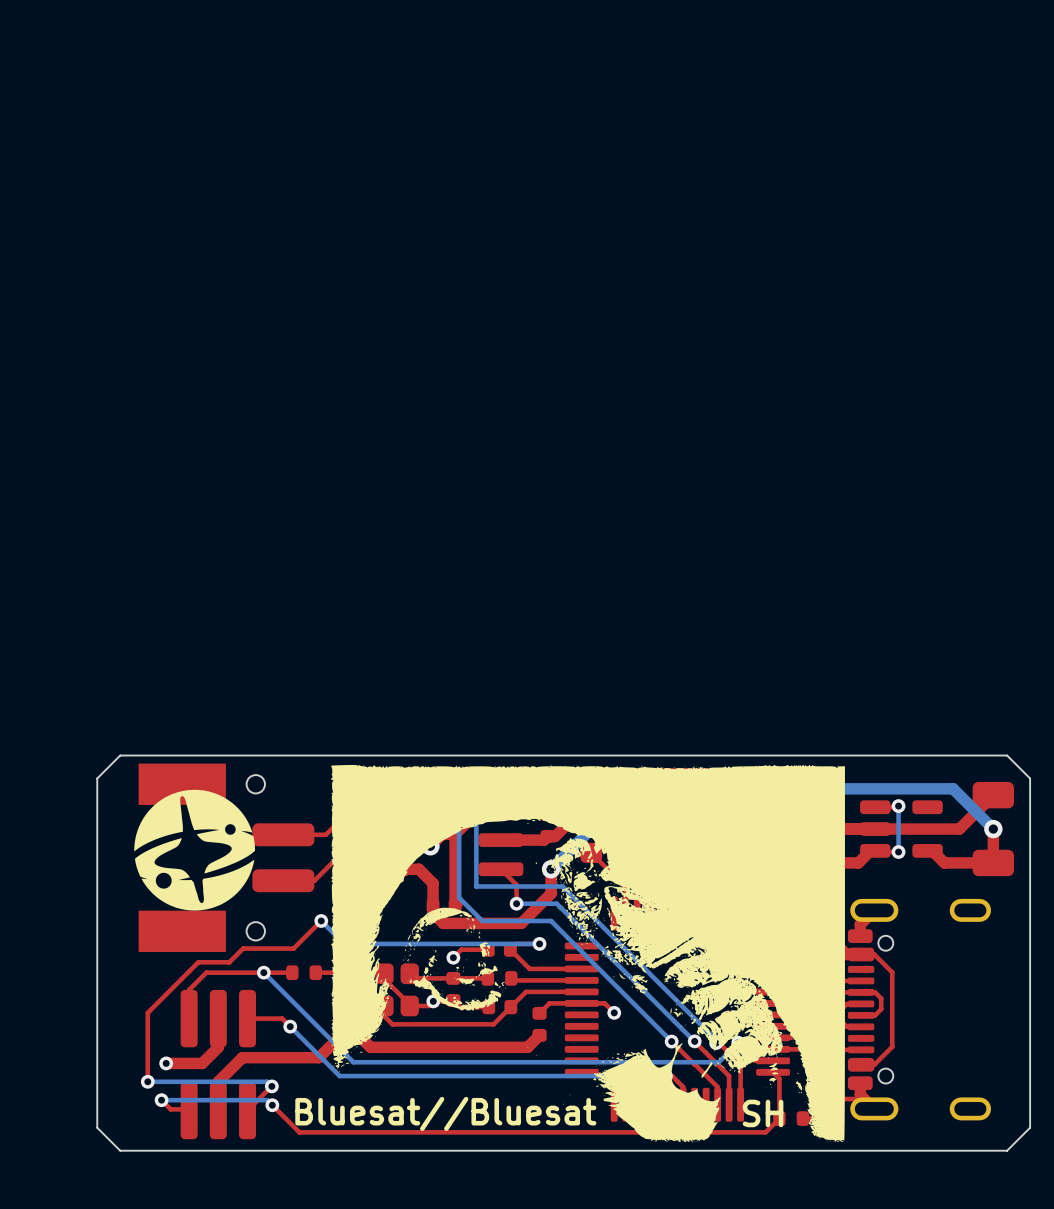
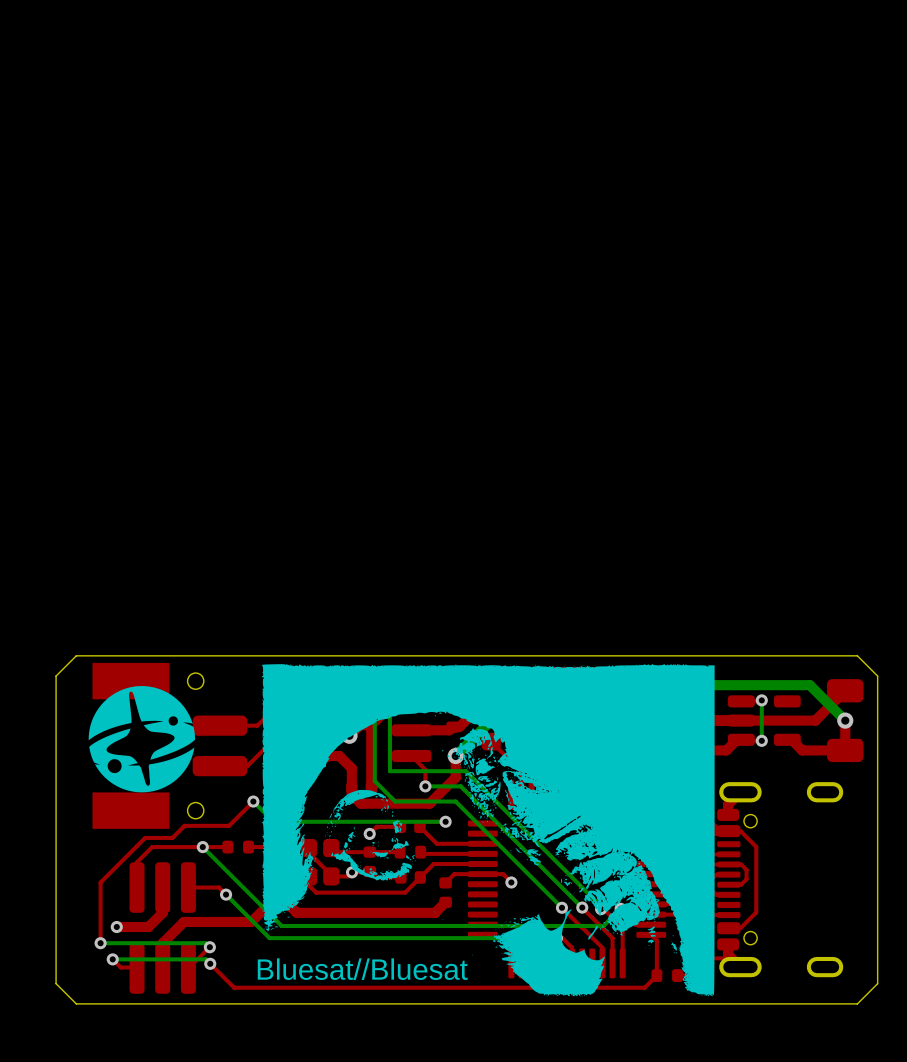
text: SH (763, 1113) -> none

